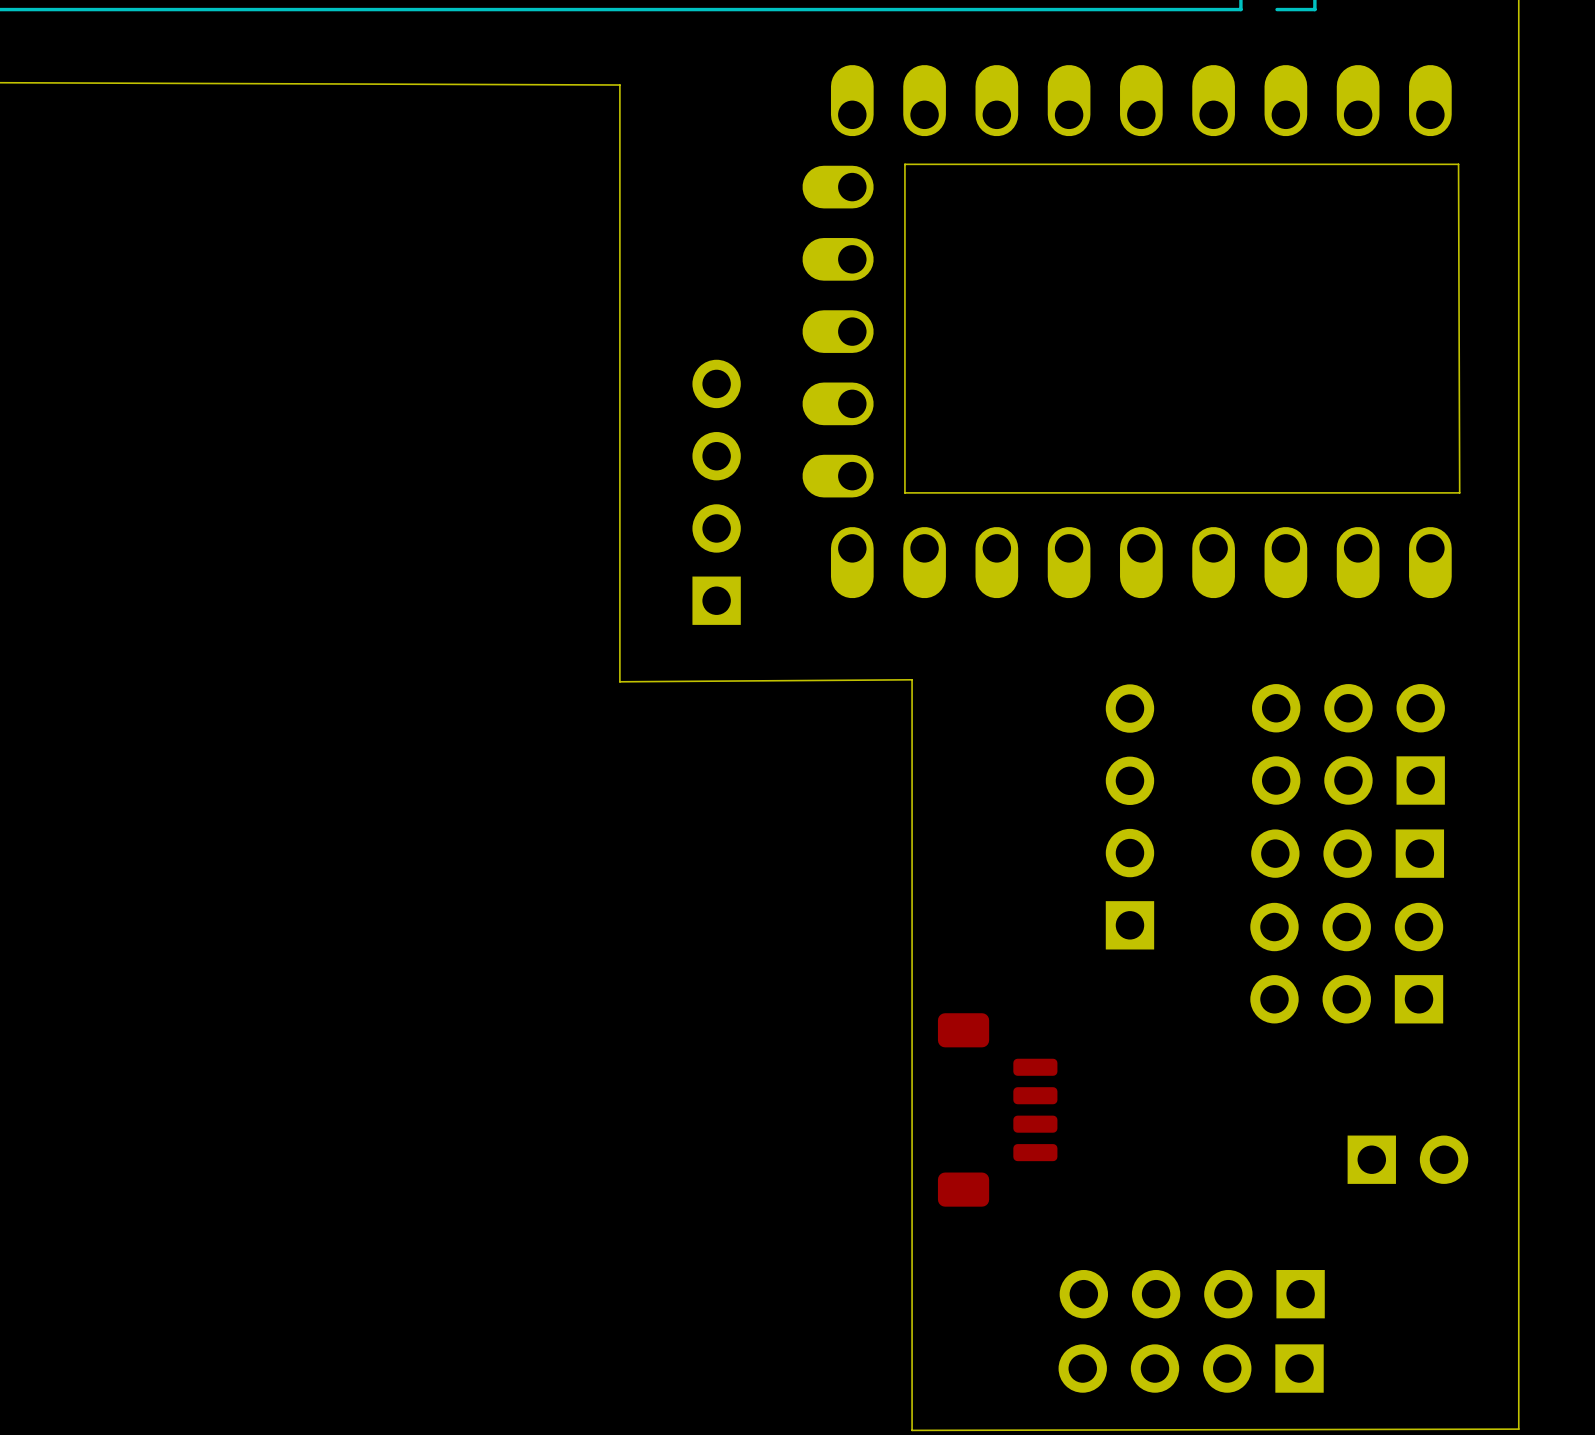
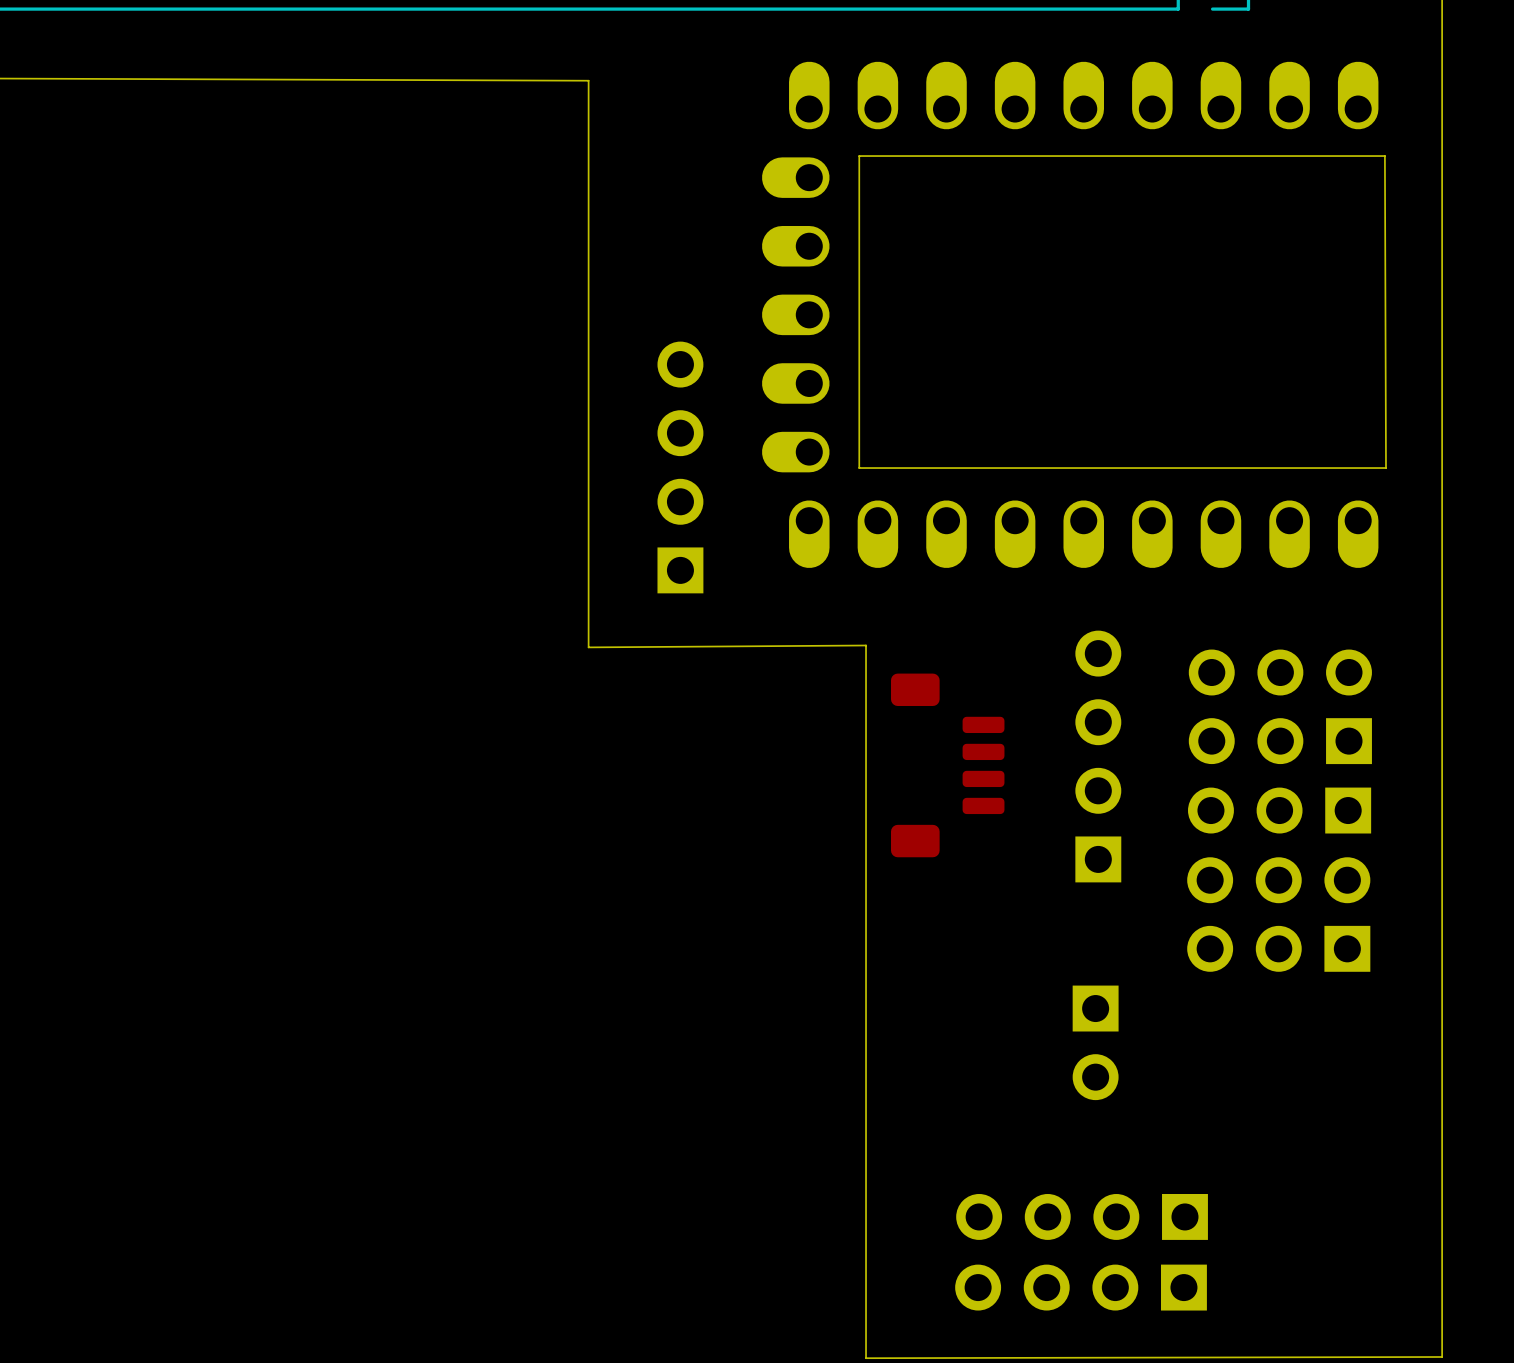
part position: (1129, 816) -> (1098, 756)
part position: (997, 1109) -> (947, 765)
part rotation: 0° (1407, 1159) -> 90° clockwise (1095, 1042)
part position: (1407, 1159) -> (1095, 1042)
part: none -> (1082, 1216)
part: (1192, 1294) -> none
part: none -> (1081, 1287)
part: (1191, 1368) -> none

